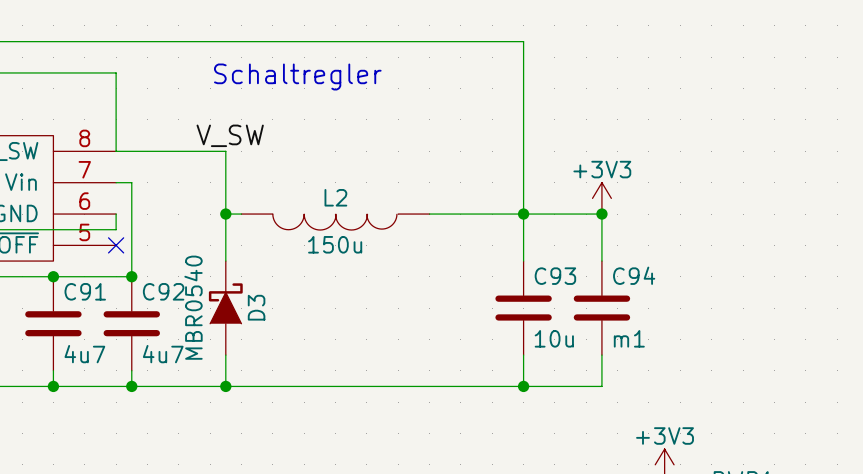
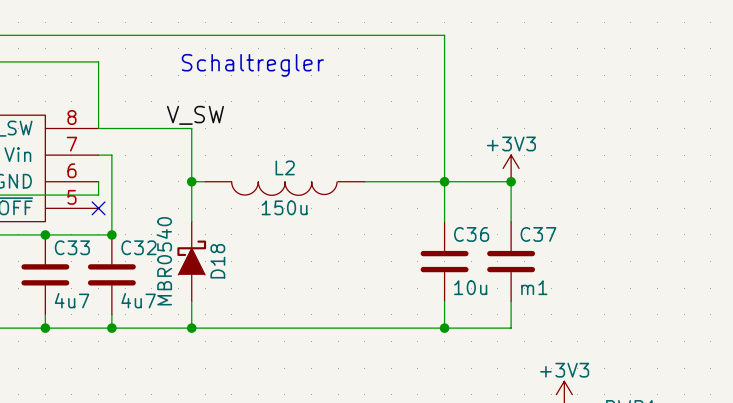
C94 name: C94 (634, 275) -> C37 (538, 234)
C93 name: C93 (555, 276) -> C36 (471, 234)
C91 name: C91 (85, 291) -> C33 (72, 247)
C92 name: C92 (163, 291) -> C32 (138, 247)
D3 name: D3 (256, 307) -> D18 (217, 261)

